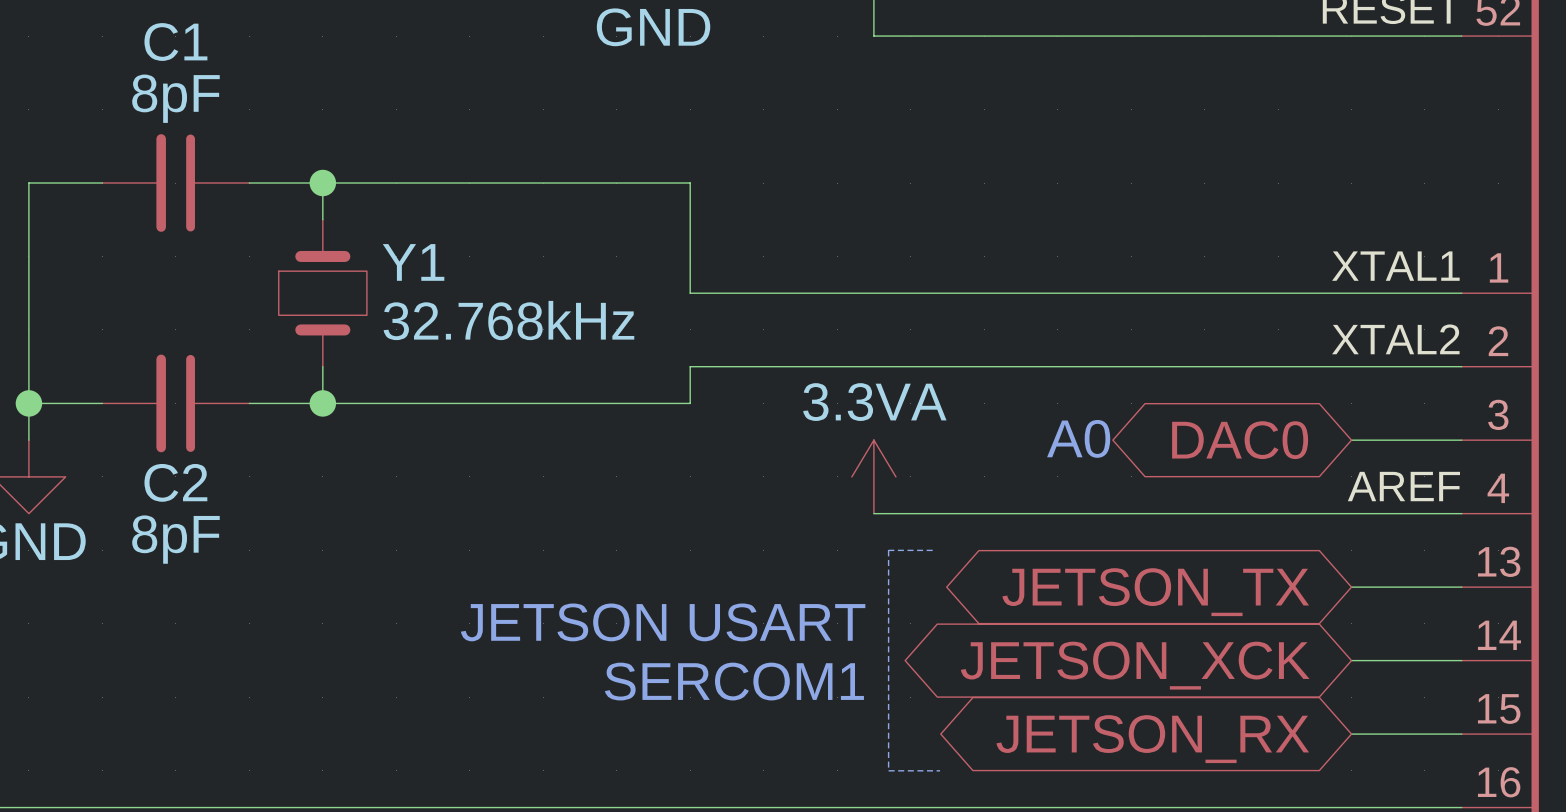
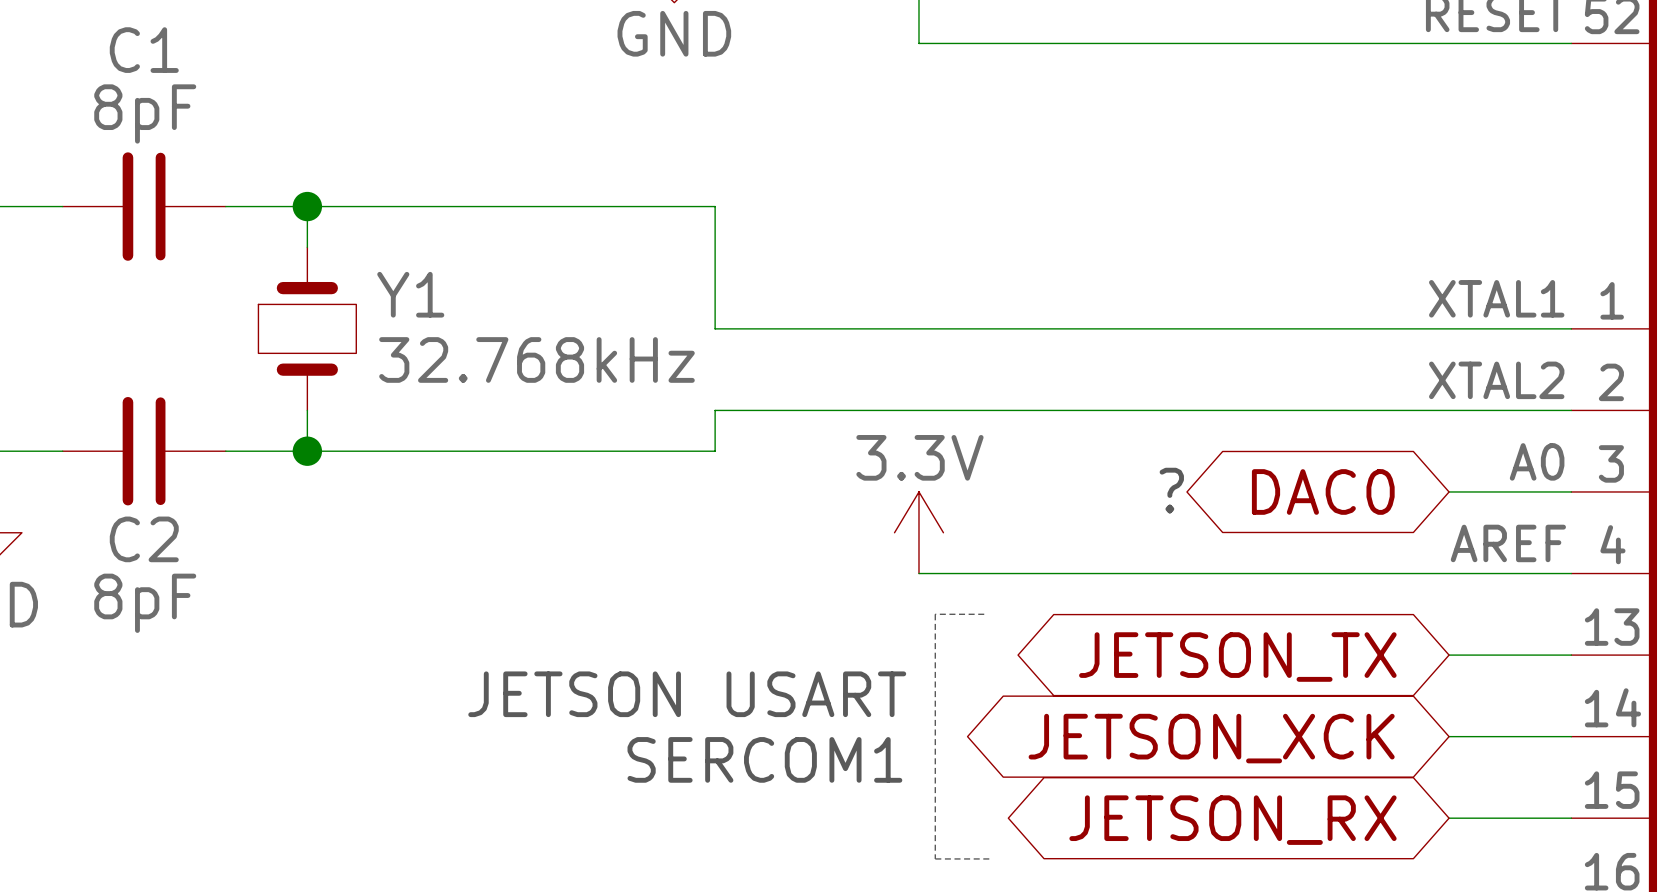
label: none -> A0 (1537, 461)
text: A0 (1078, 438) -> ? (1171, 490)
power symbol: 3.3VA (873, 476) -> 3.3V (918, 532)

